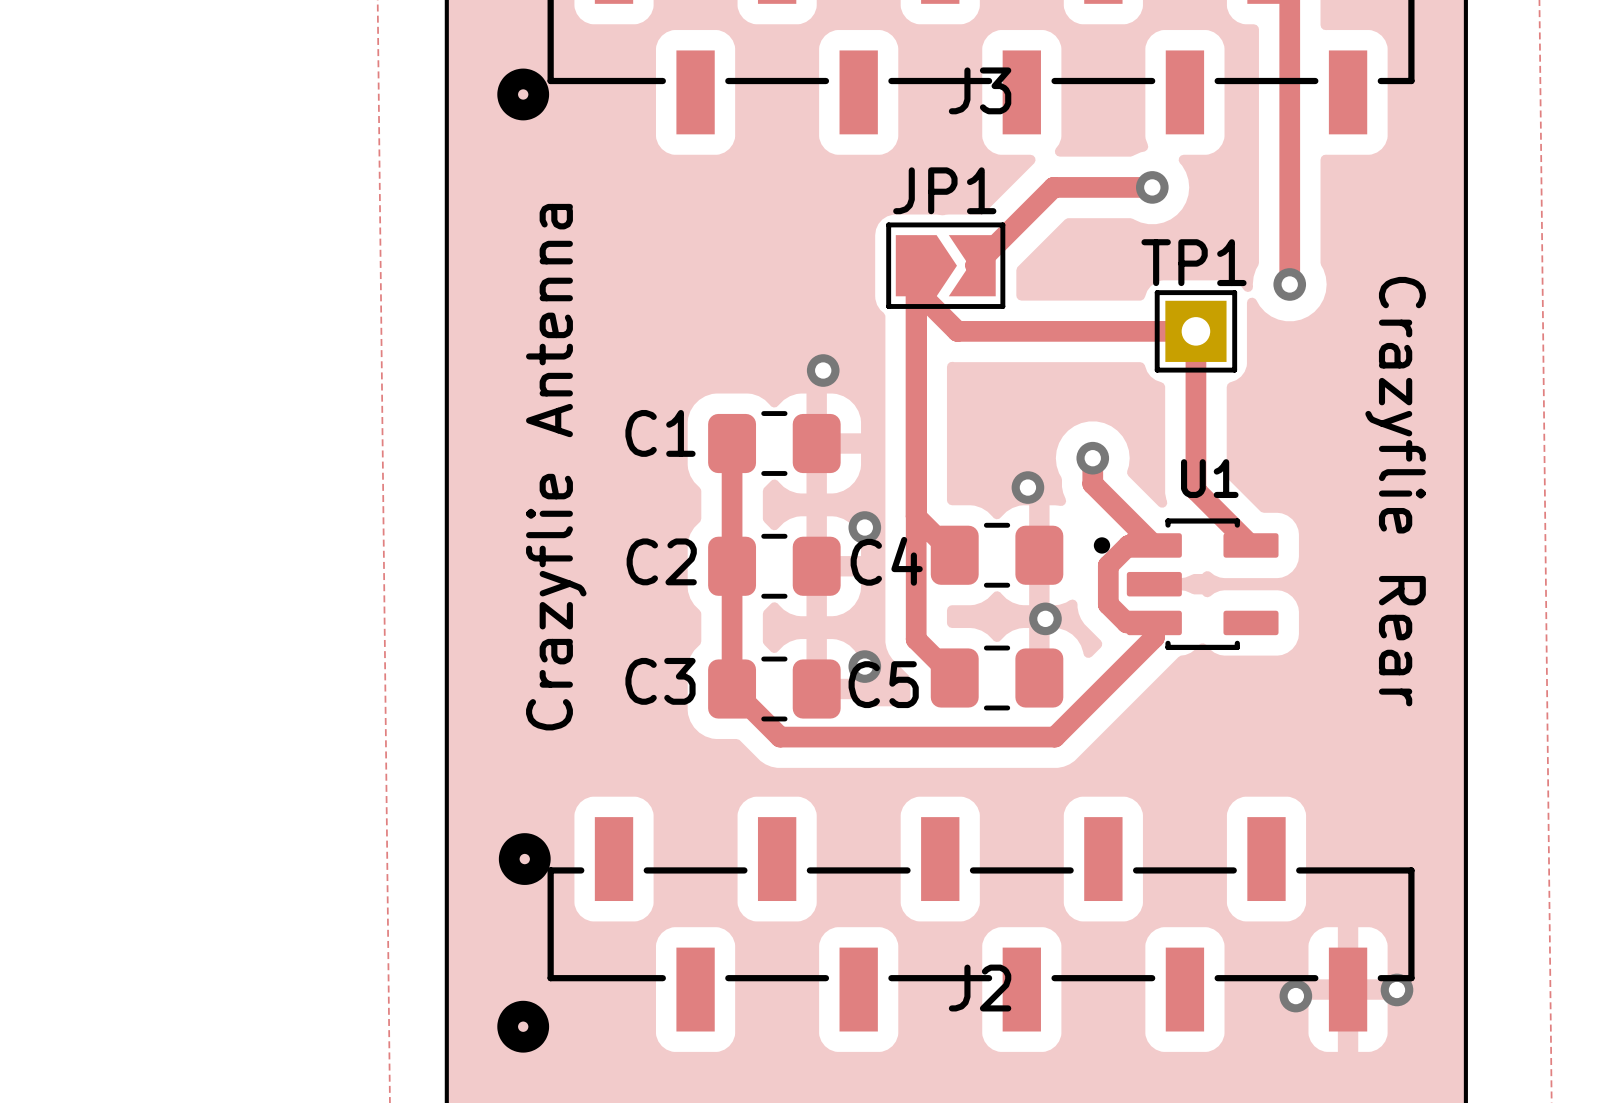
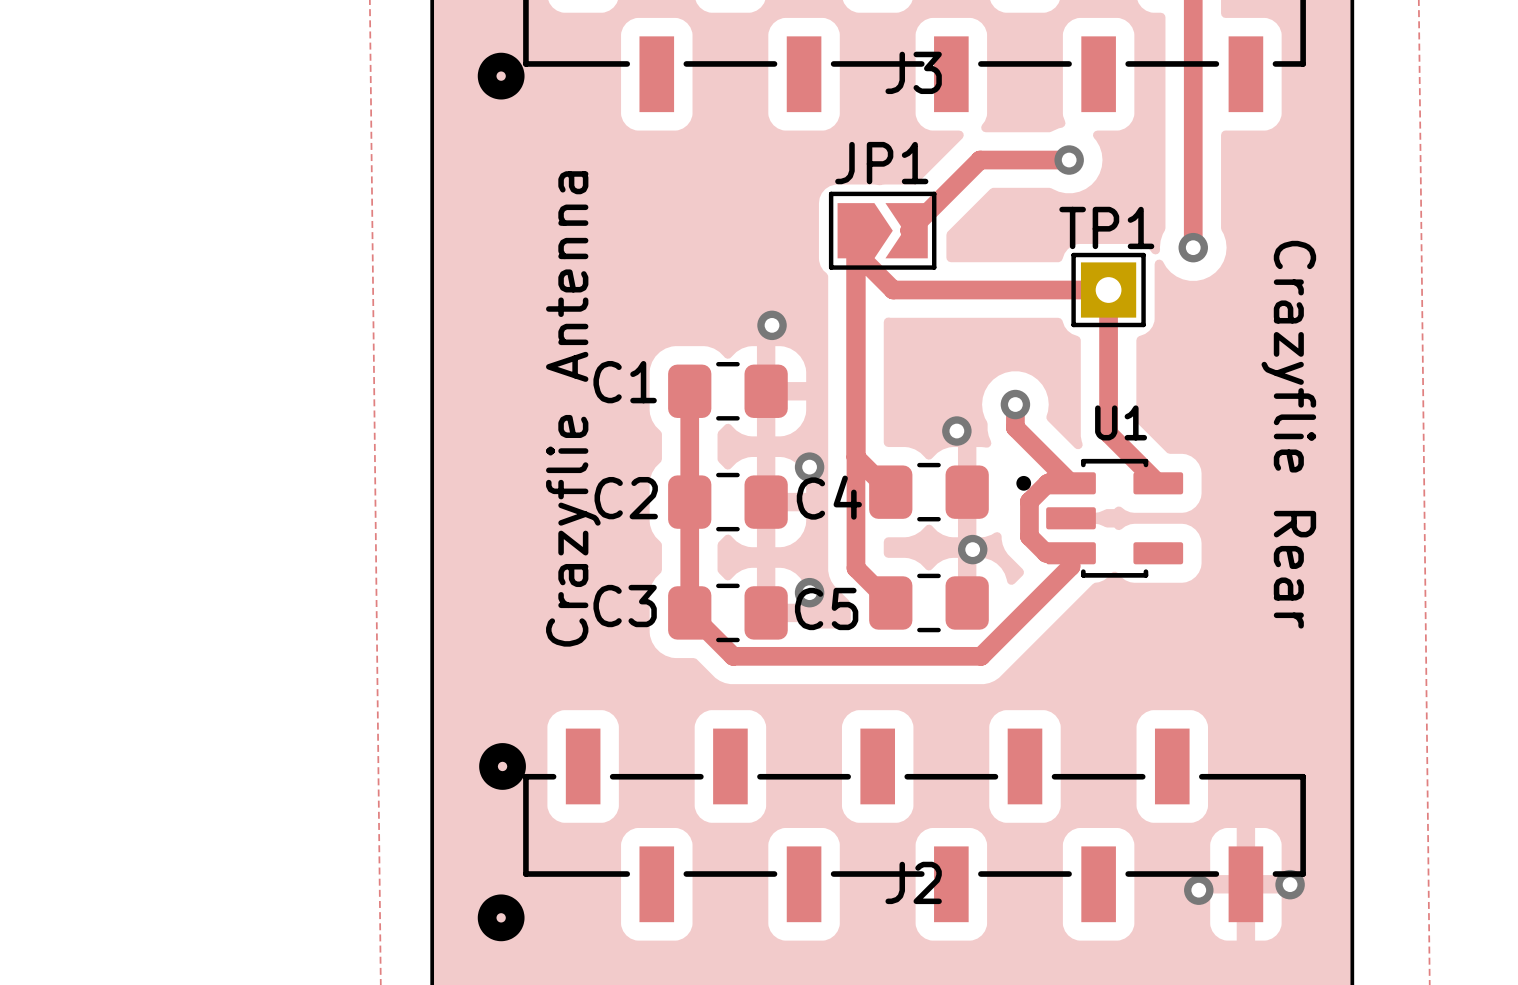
text position: Crazyflie Antenna (556, 467) -> Crazyflie Antenna (573, 408)

